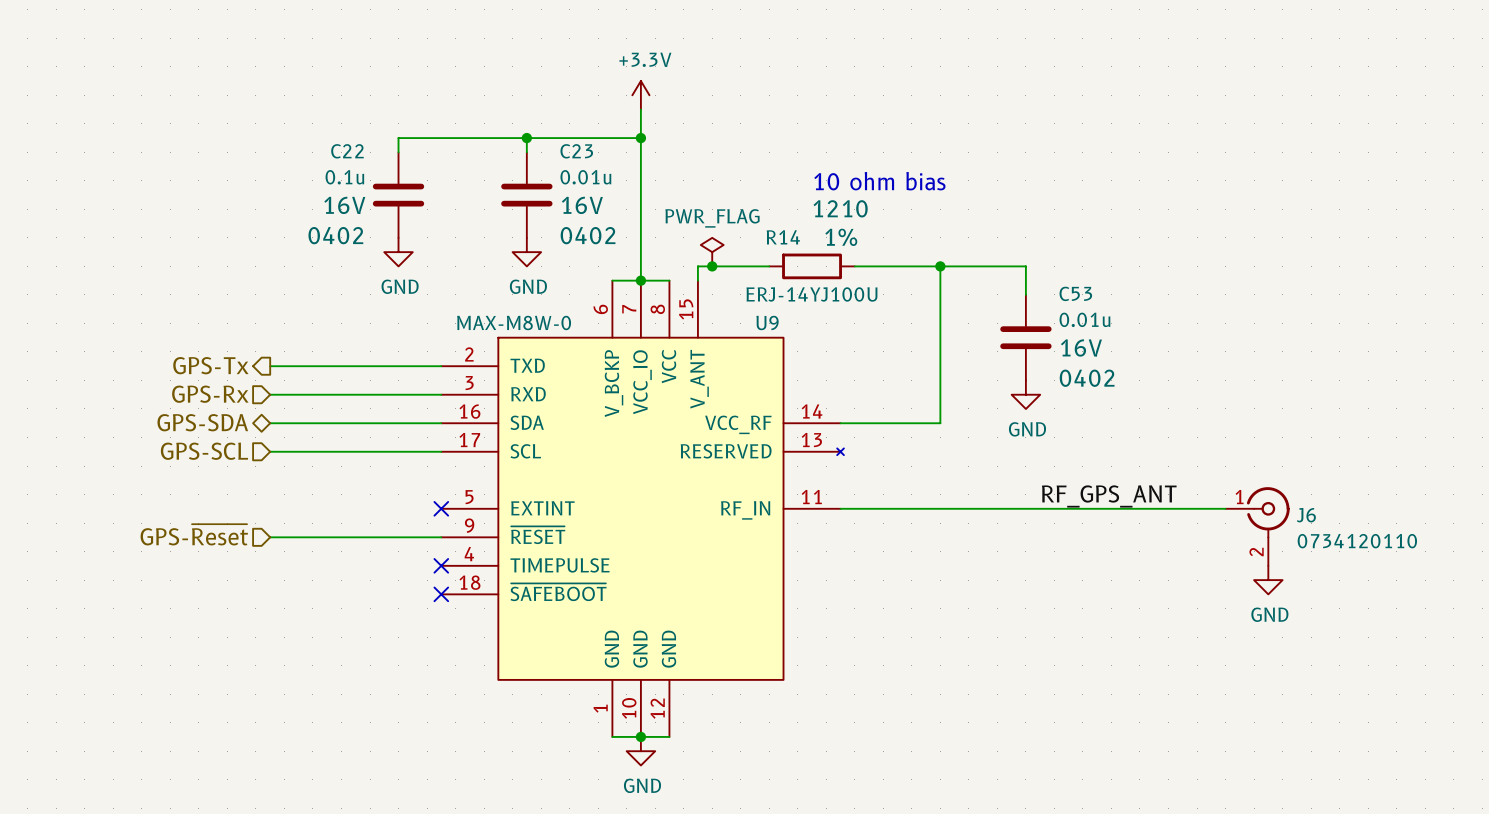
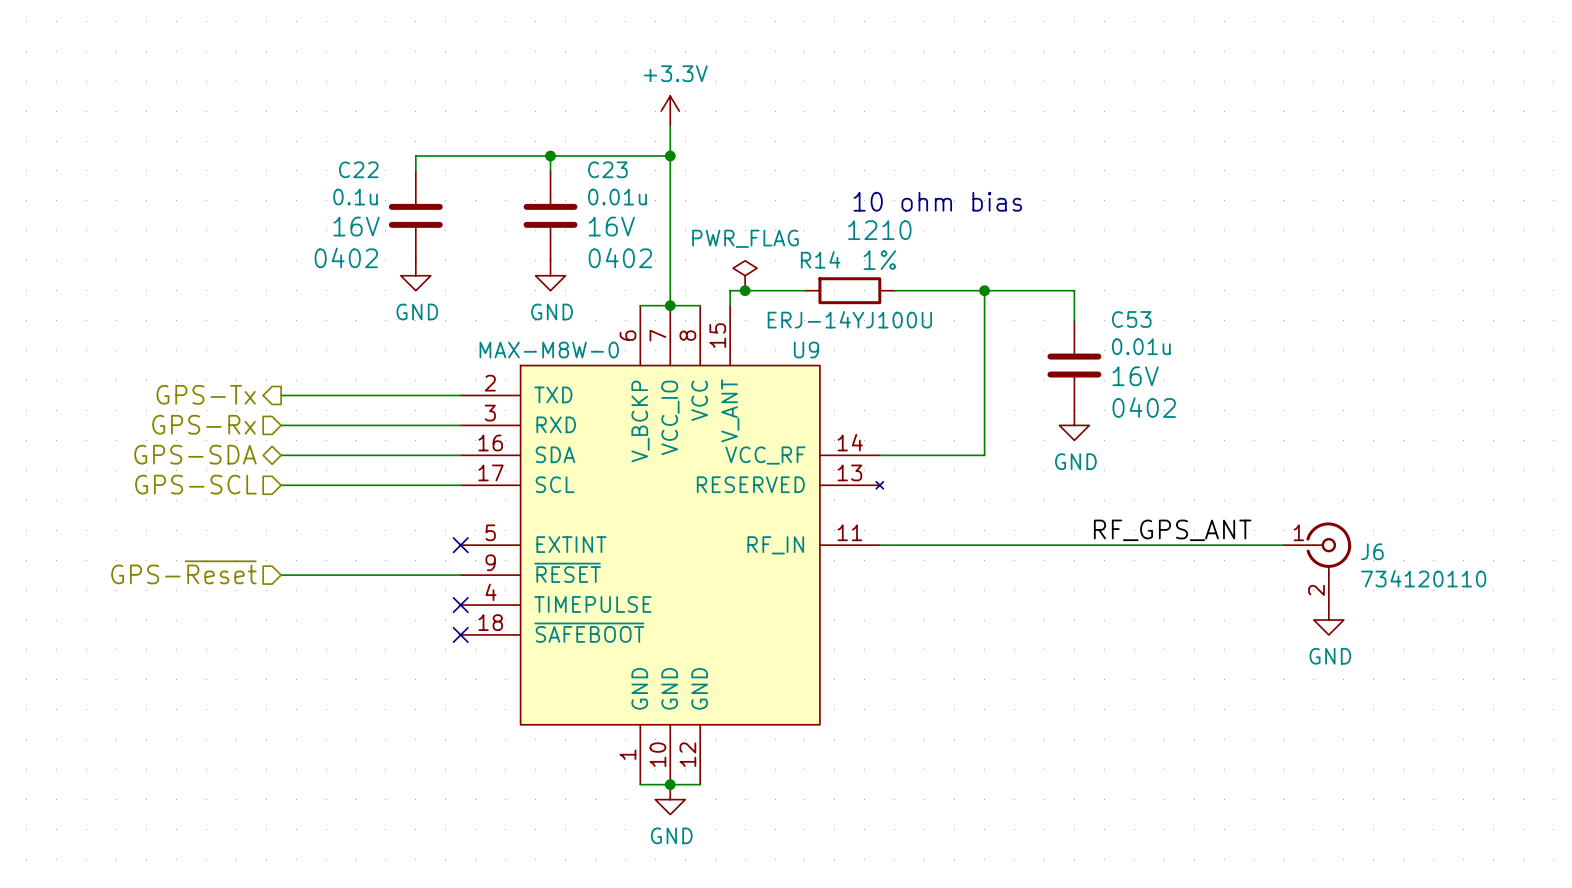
J6 value: 0734120110 (1357, 541) -> 734120110 (1423, 578)

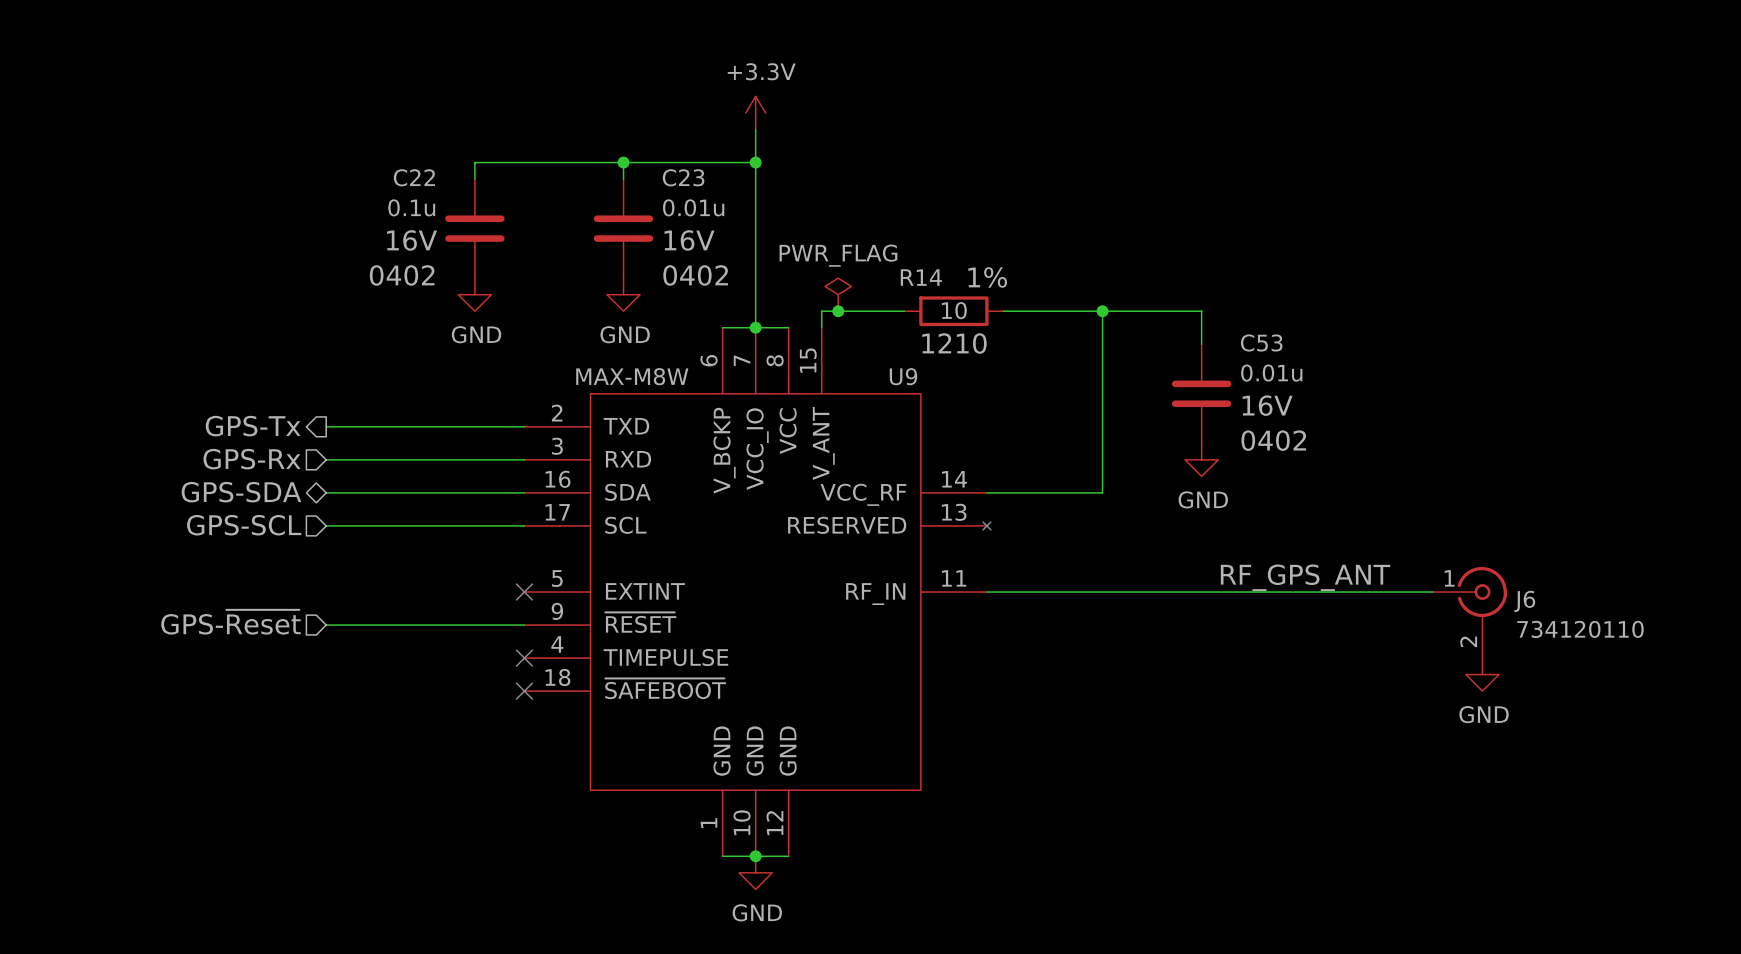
text: 10 ohm bias (937, 201) -> none
R14 text position: 1210 (879, 230) -> 1210 (954, 343)
R14 value: ERJ-14YJ100U (849, 319) -> 10 (954, 310)
U9 value: MAX-M8W-0 (549, 350) -> MAX-M8W (632, 376)

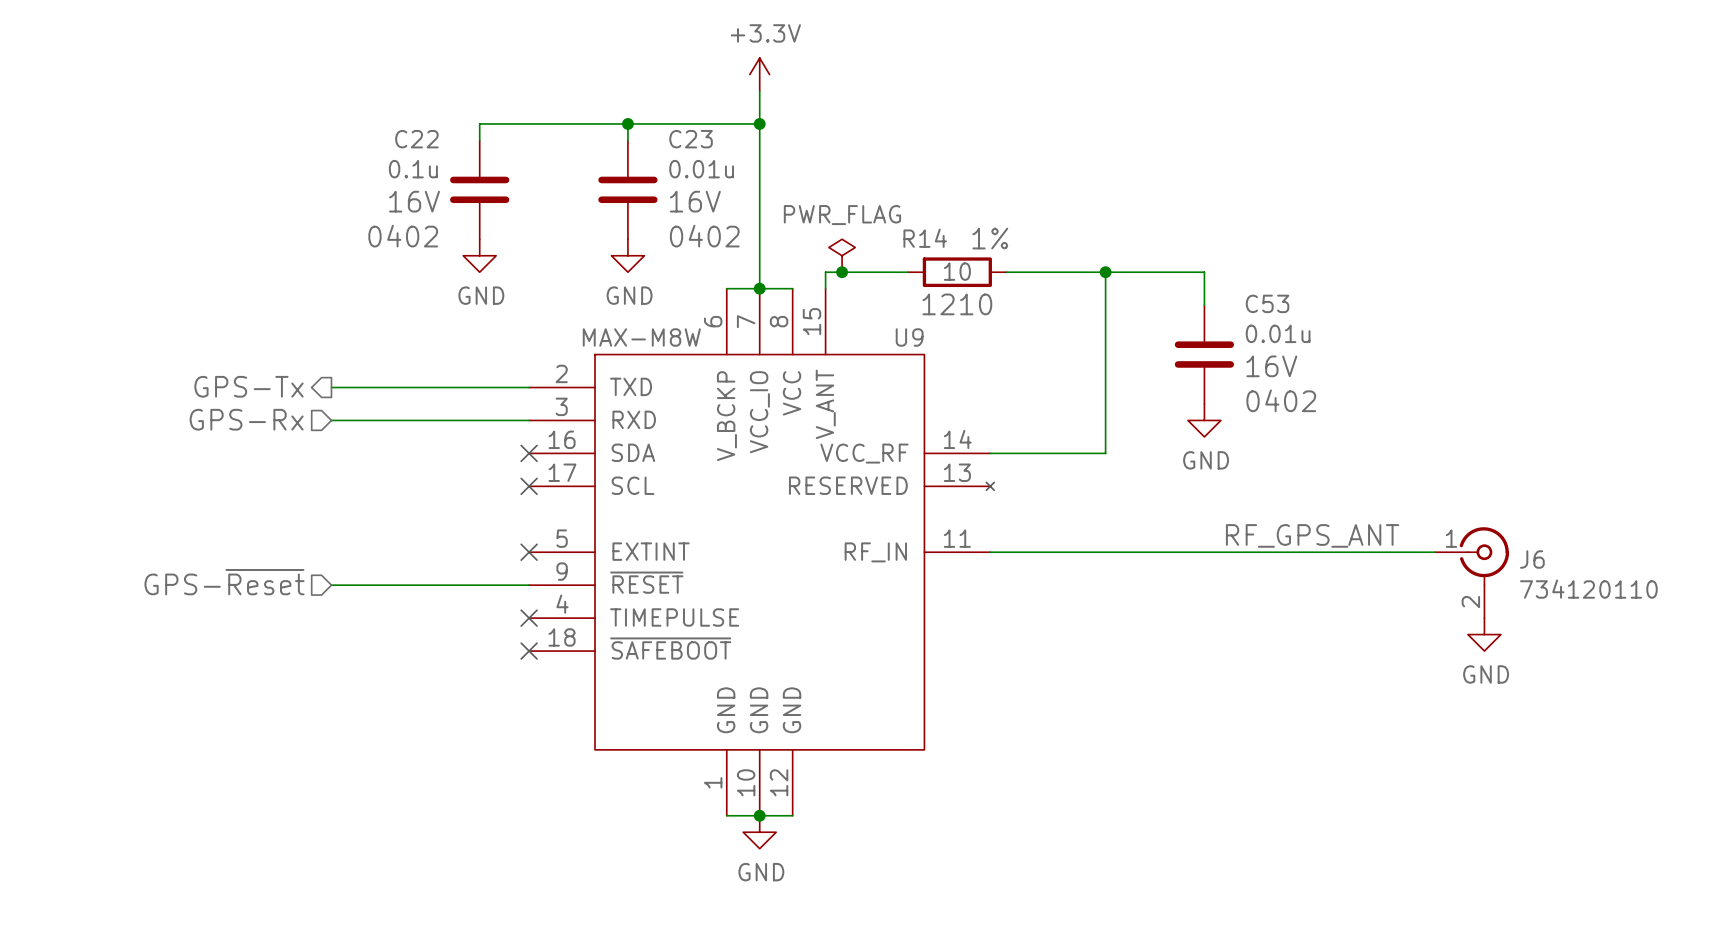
hierarchical label: GPS-SDA (241, 492) -> none
wire: (326, 492) (524, 492) -> none
no-connect mark: none -> (529, 453)
hierarchical label: GPS-SCL (244, 525) -> none
wire: (326, 525) (524, 525) -> none
no-connect mark: none -> (529, 486)

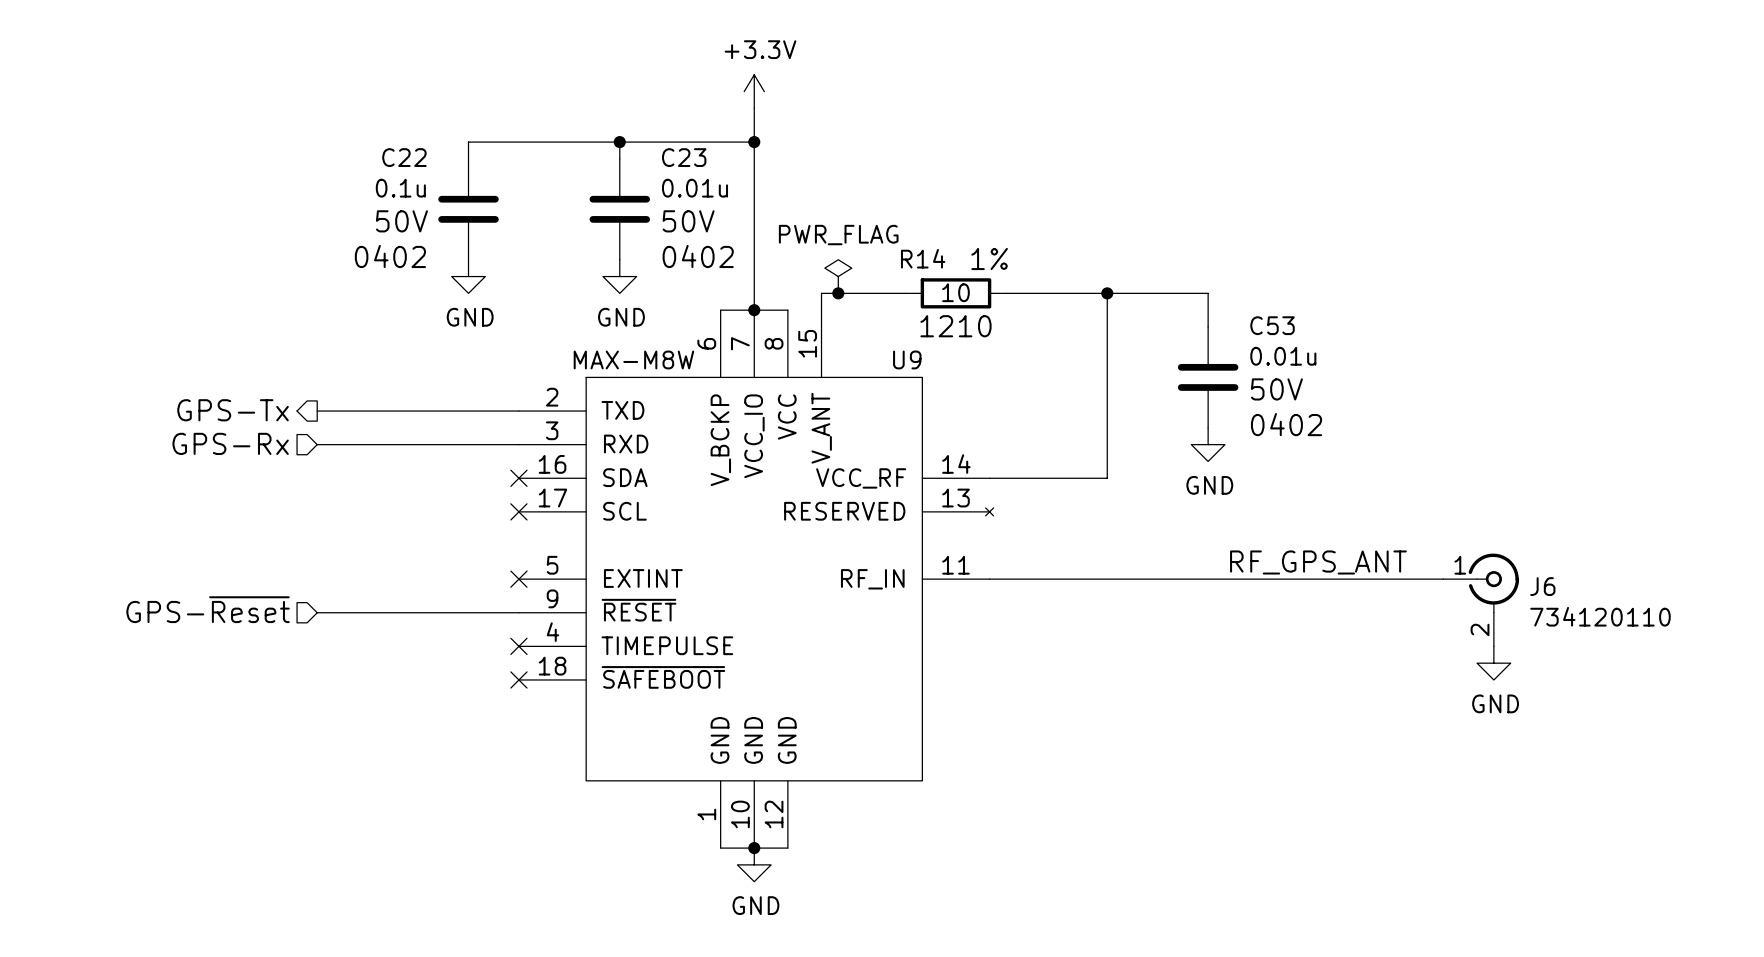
C22 text: 16V (414, 201) -> 50V (401, 221)
C23 text: 16V (695, 201) -> 50V (688, 221)
C53 text: 16V (1271, 366) -> 50V (1276, 389)

